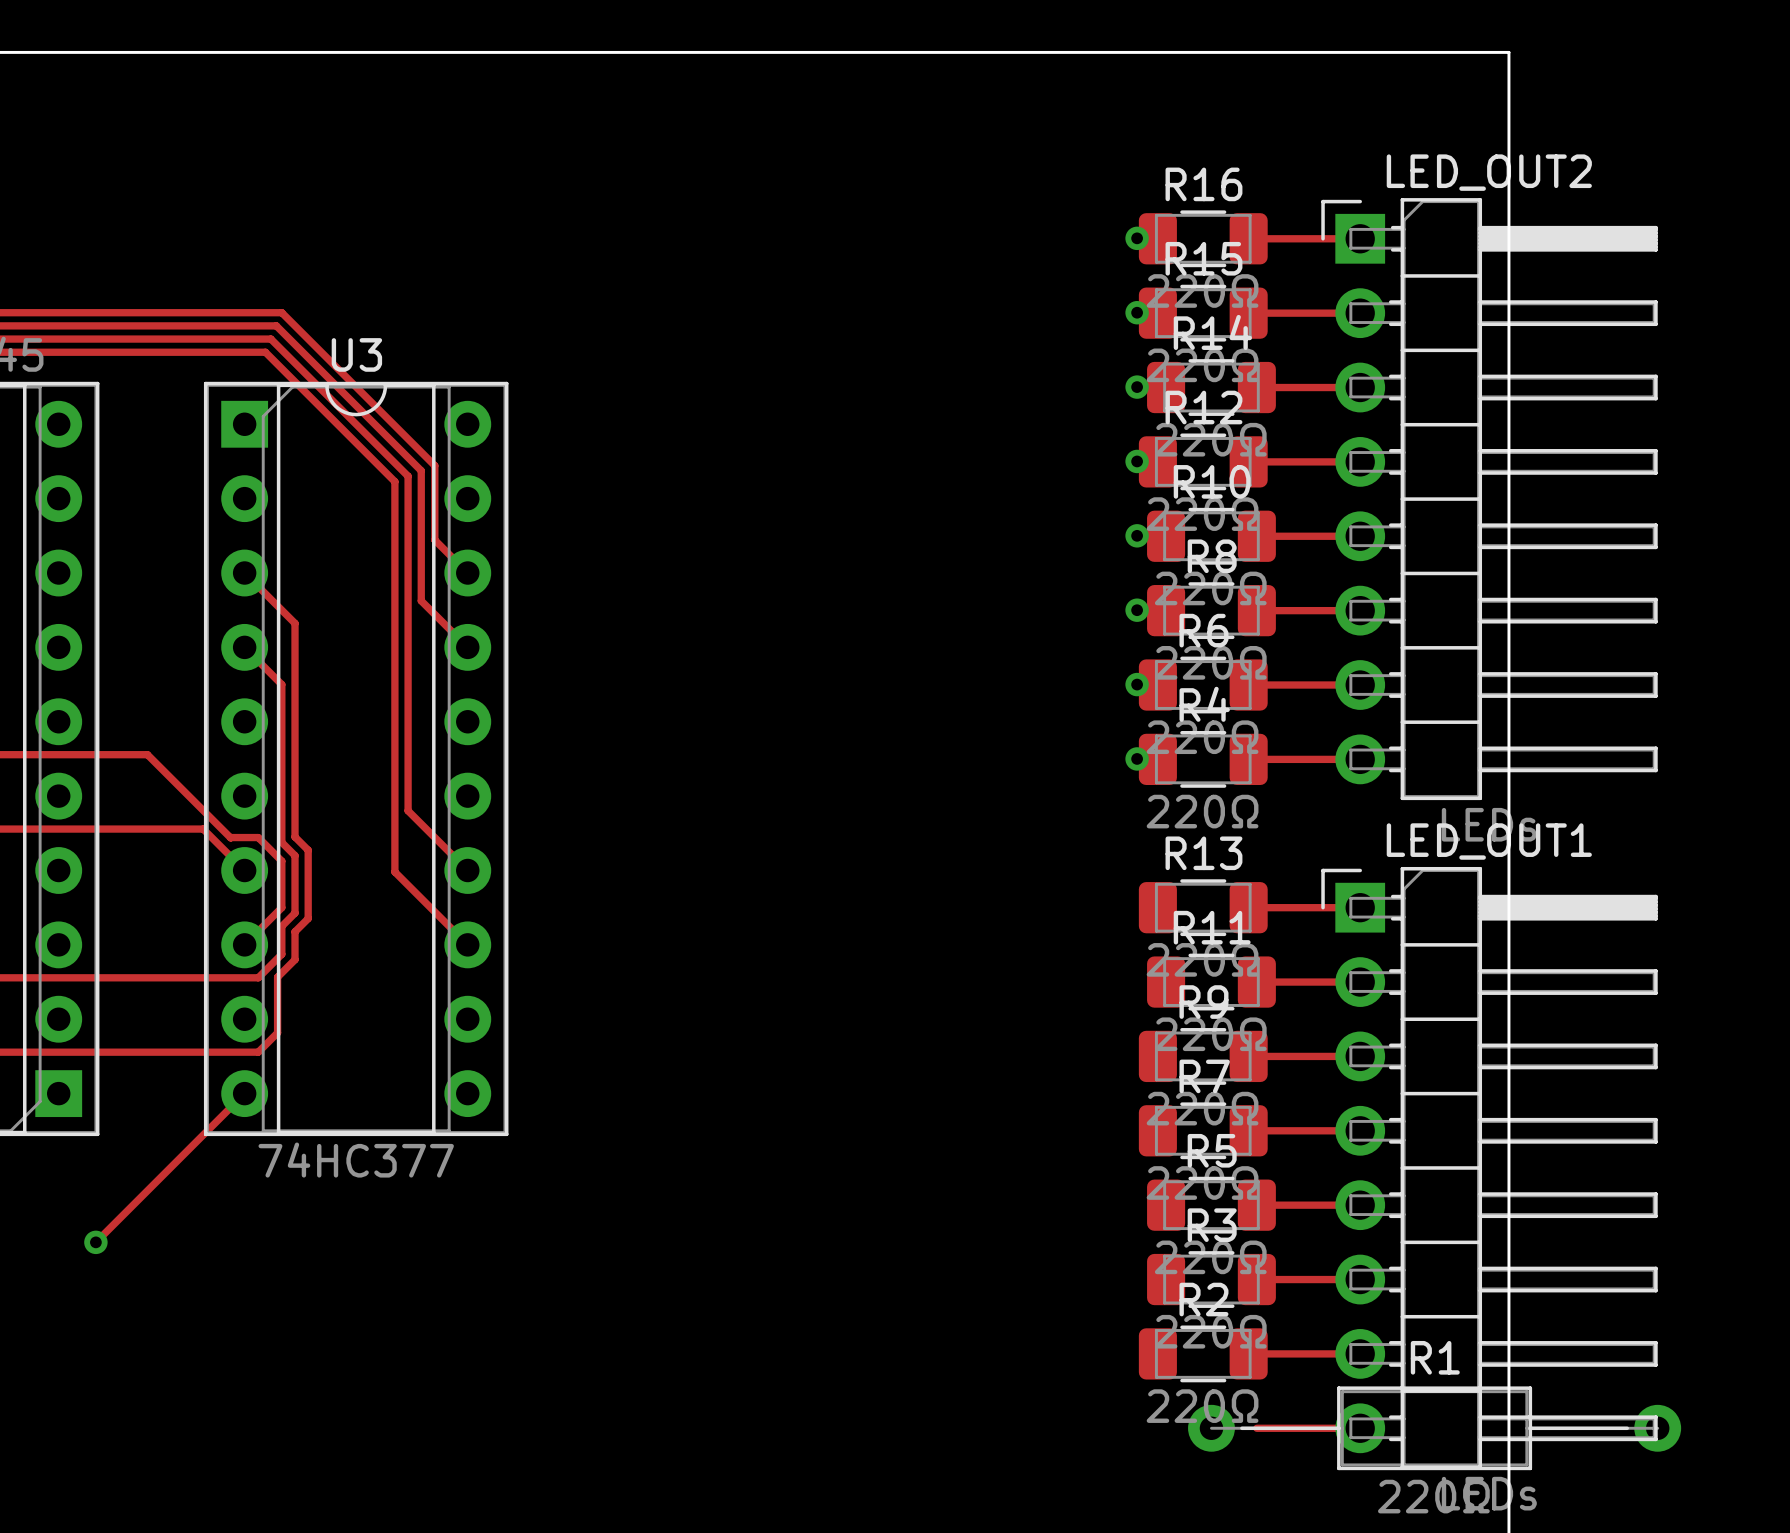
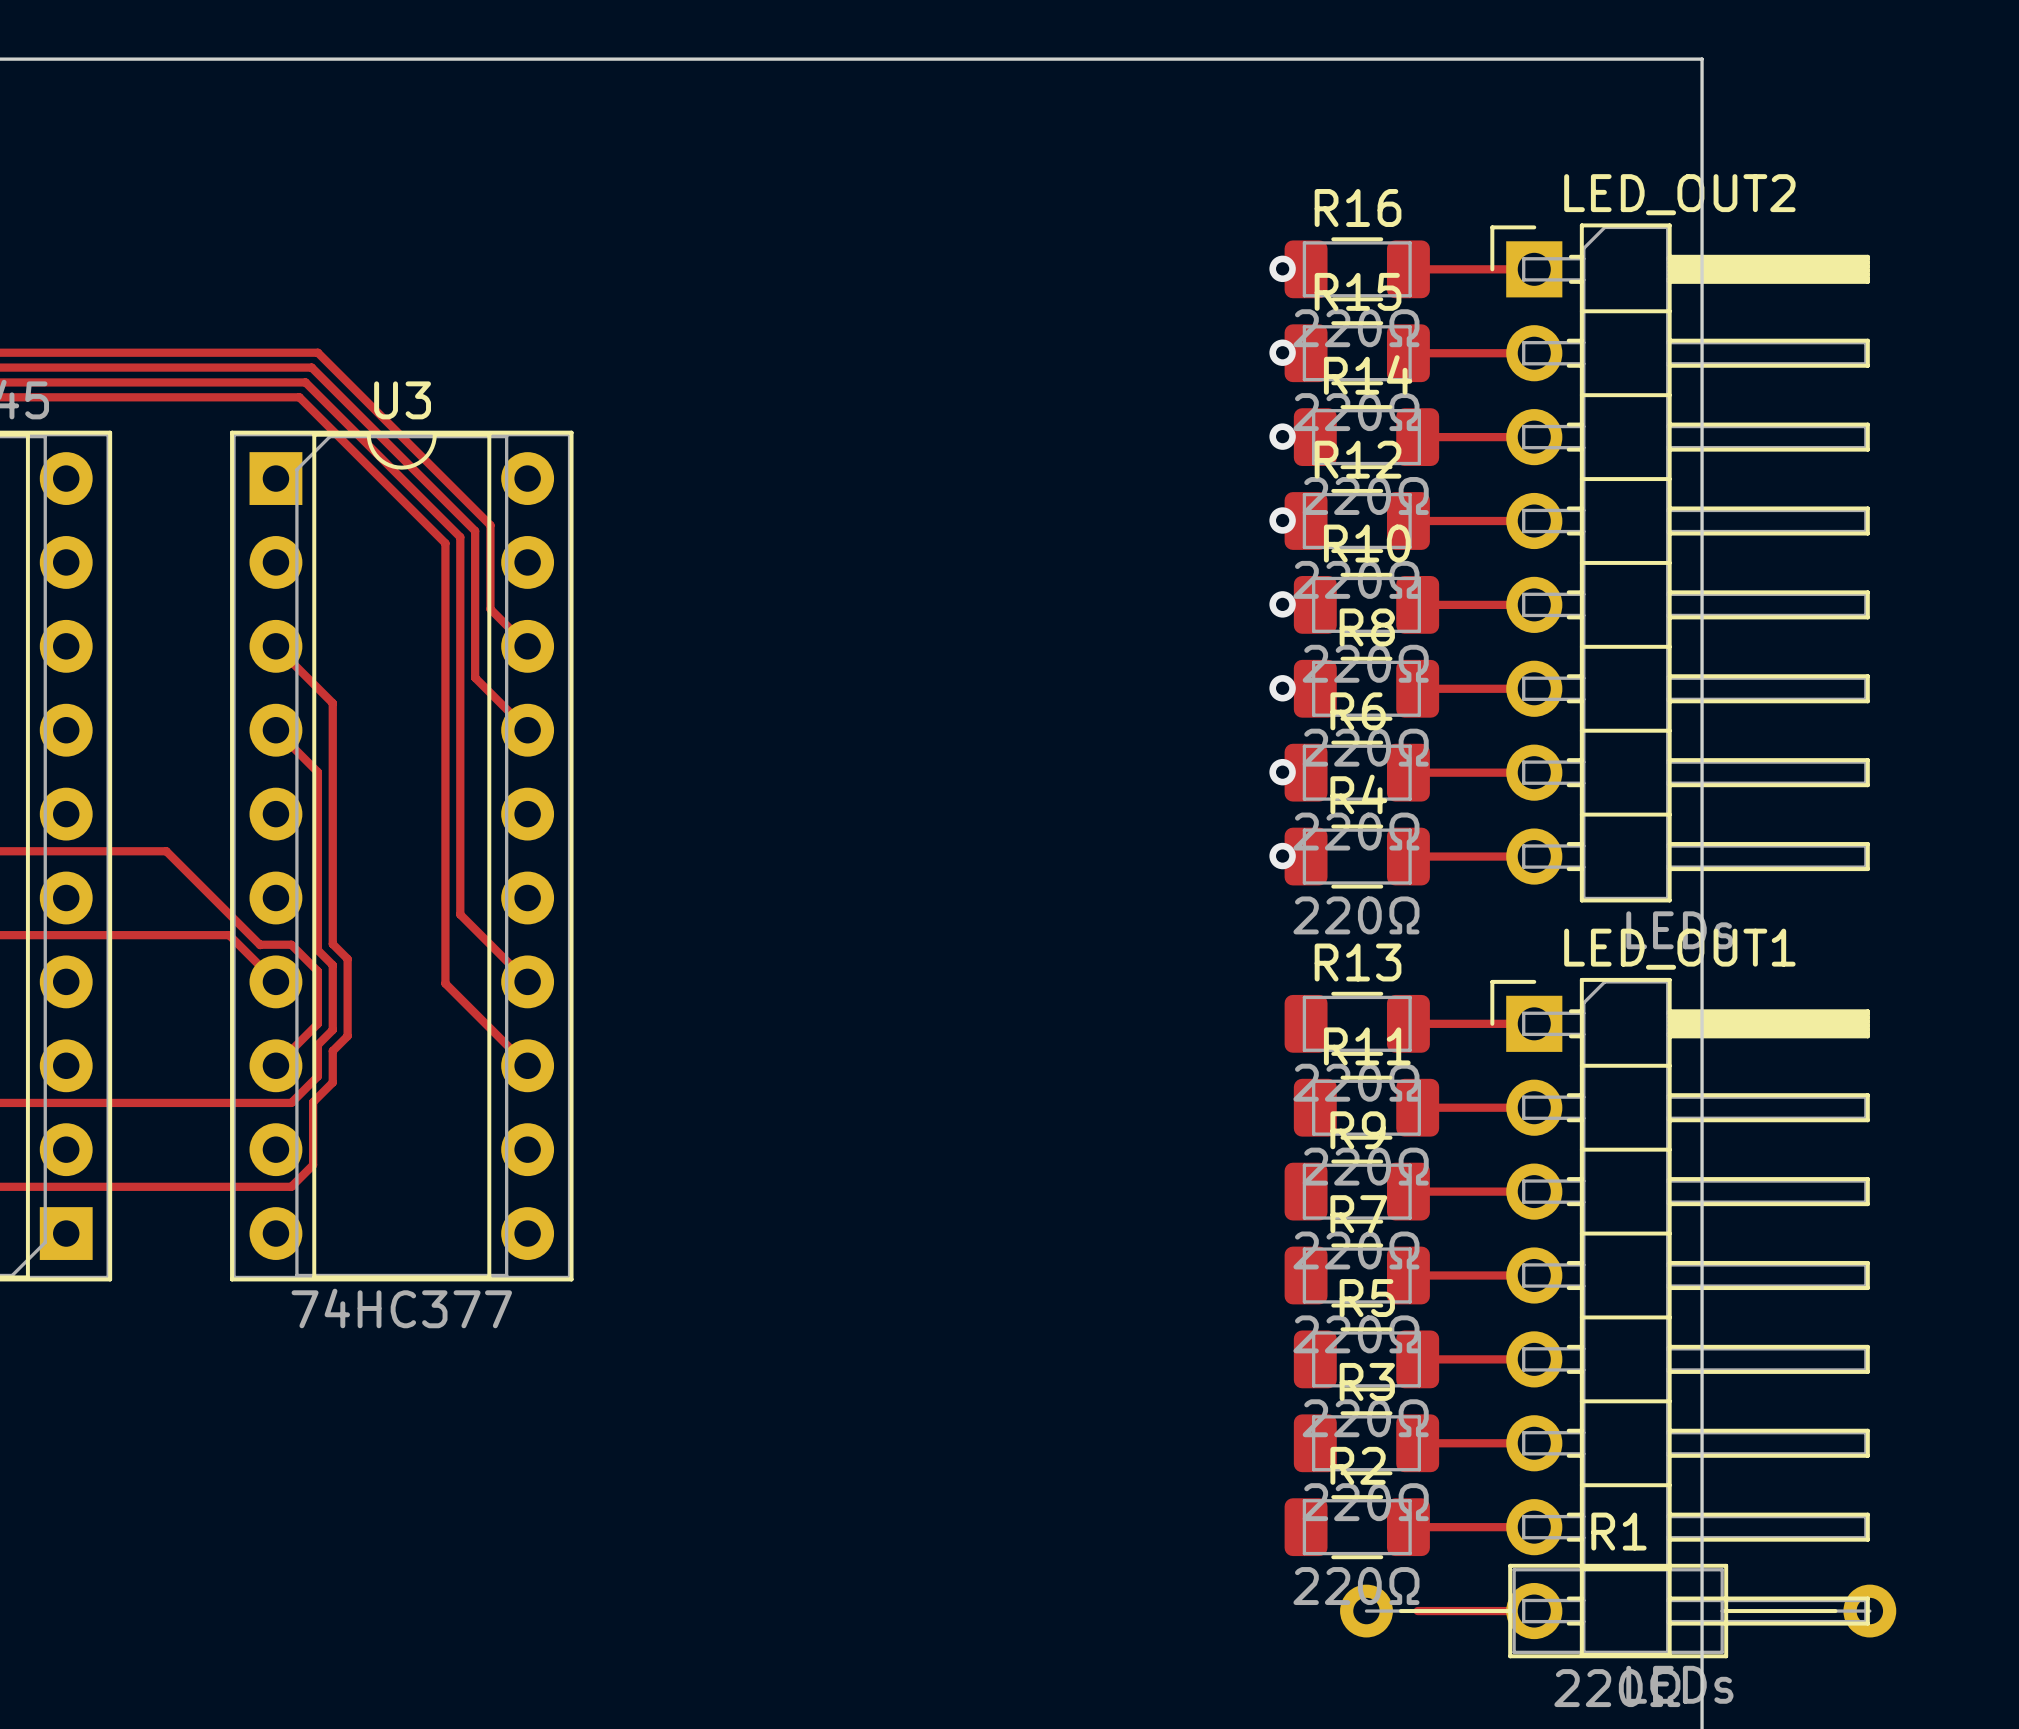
track: (244, 1093) (95, 1242) -> none
via: (95, 1242) -> none

